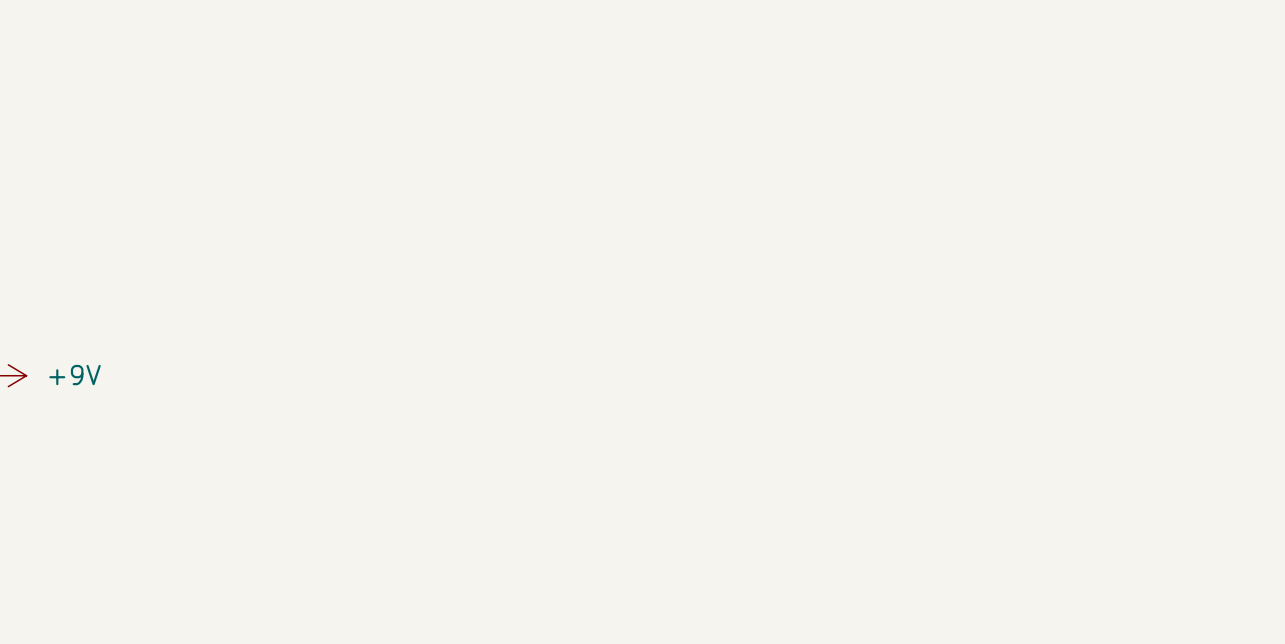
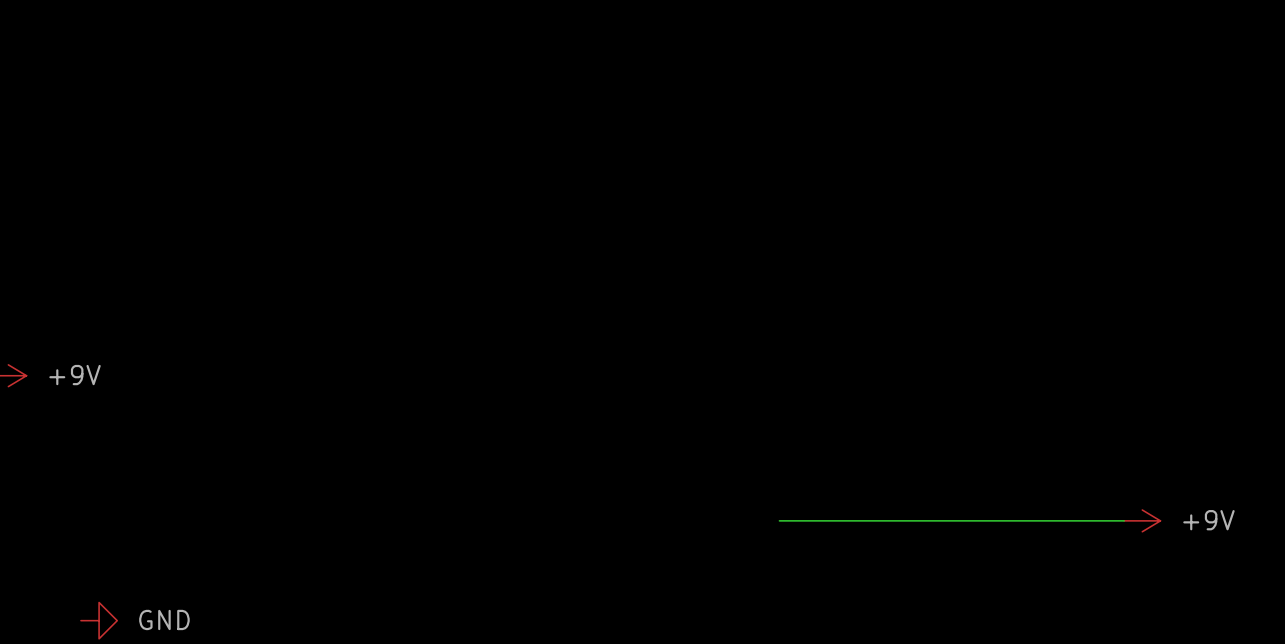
wire: none -> (779, 520) (1124, 520)
power symbol: none -> +9V (1142, 520)
power symbol: none -> GND (99, 620)

